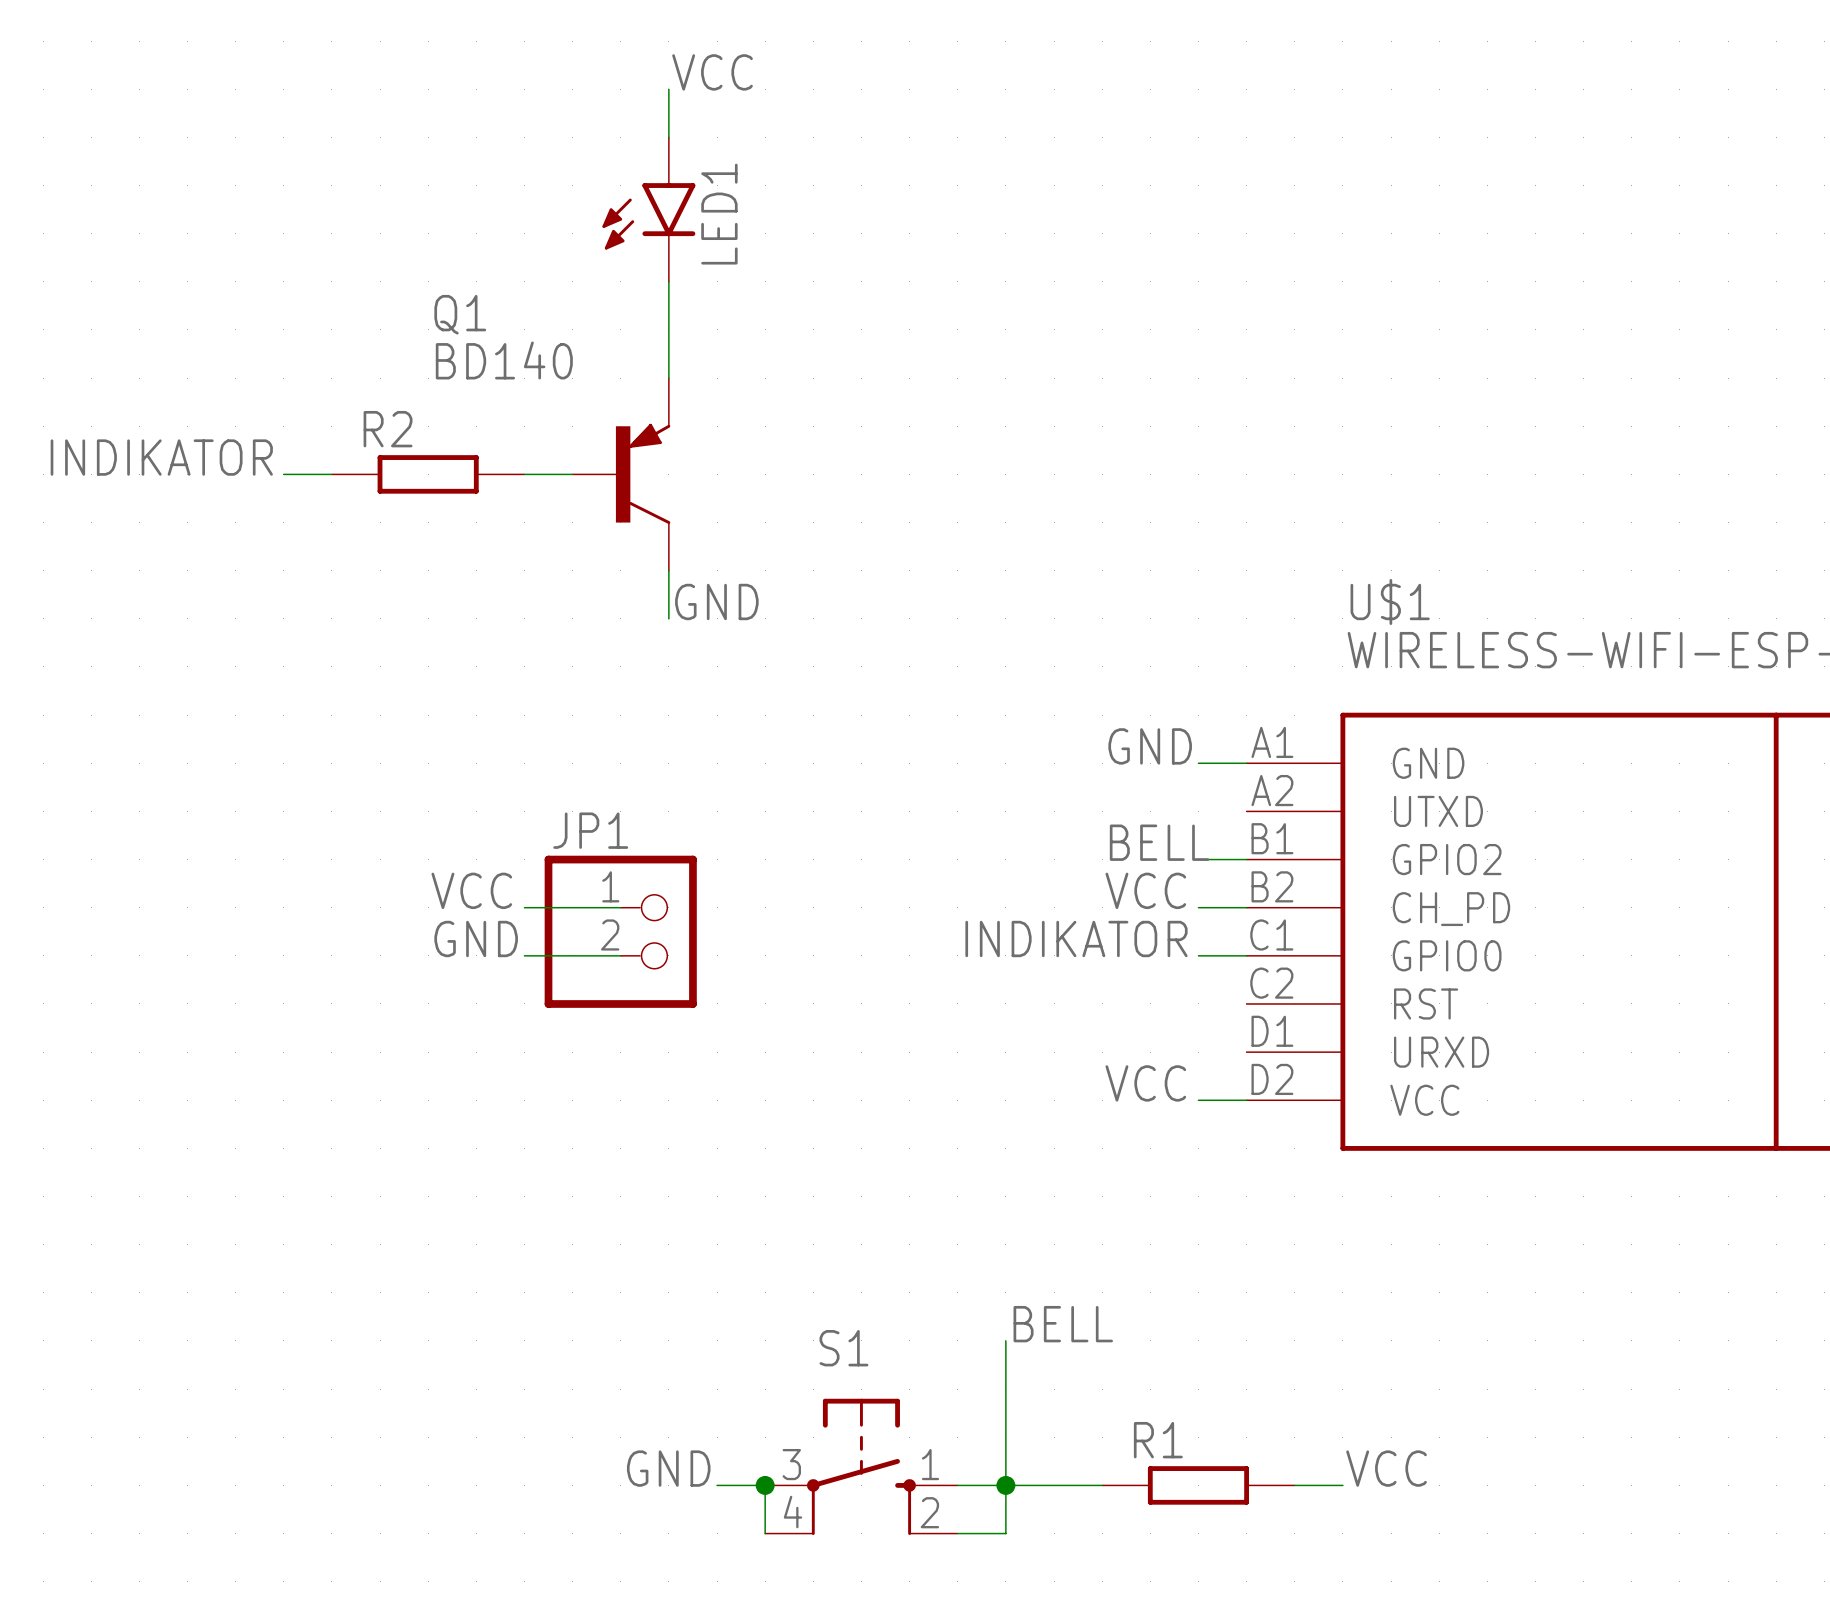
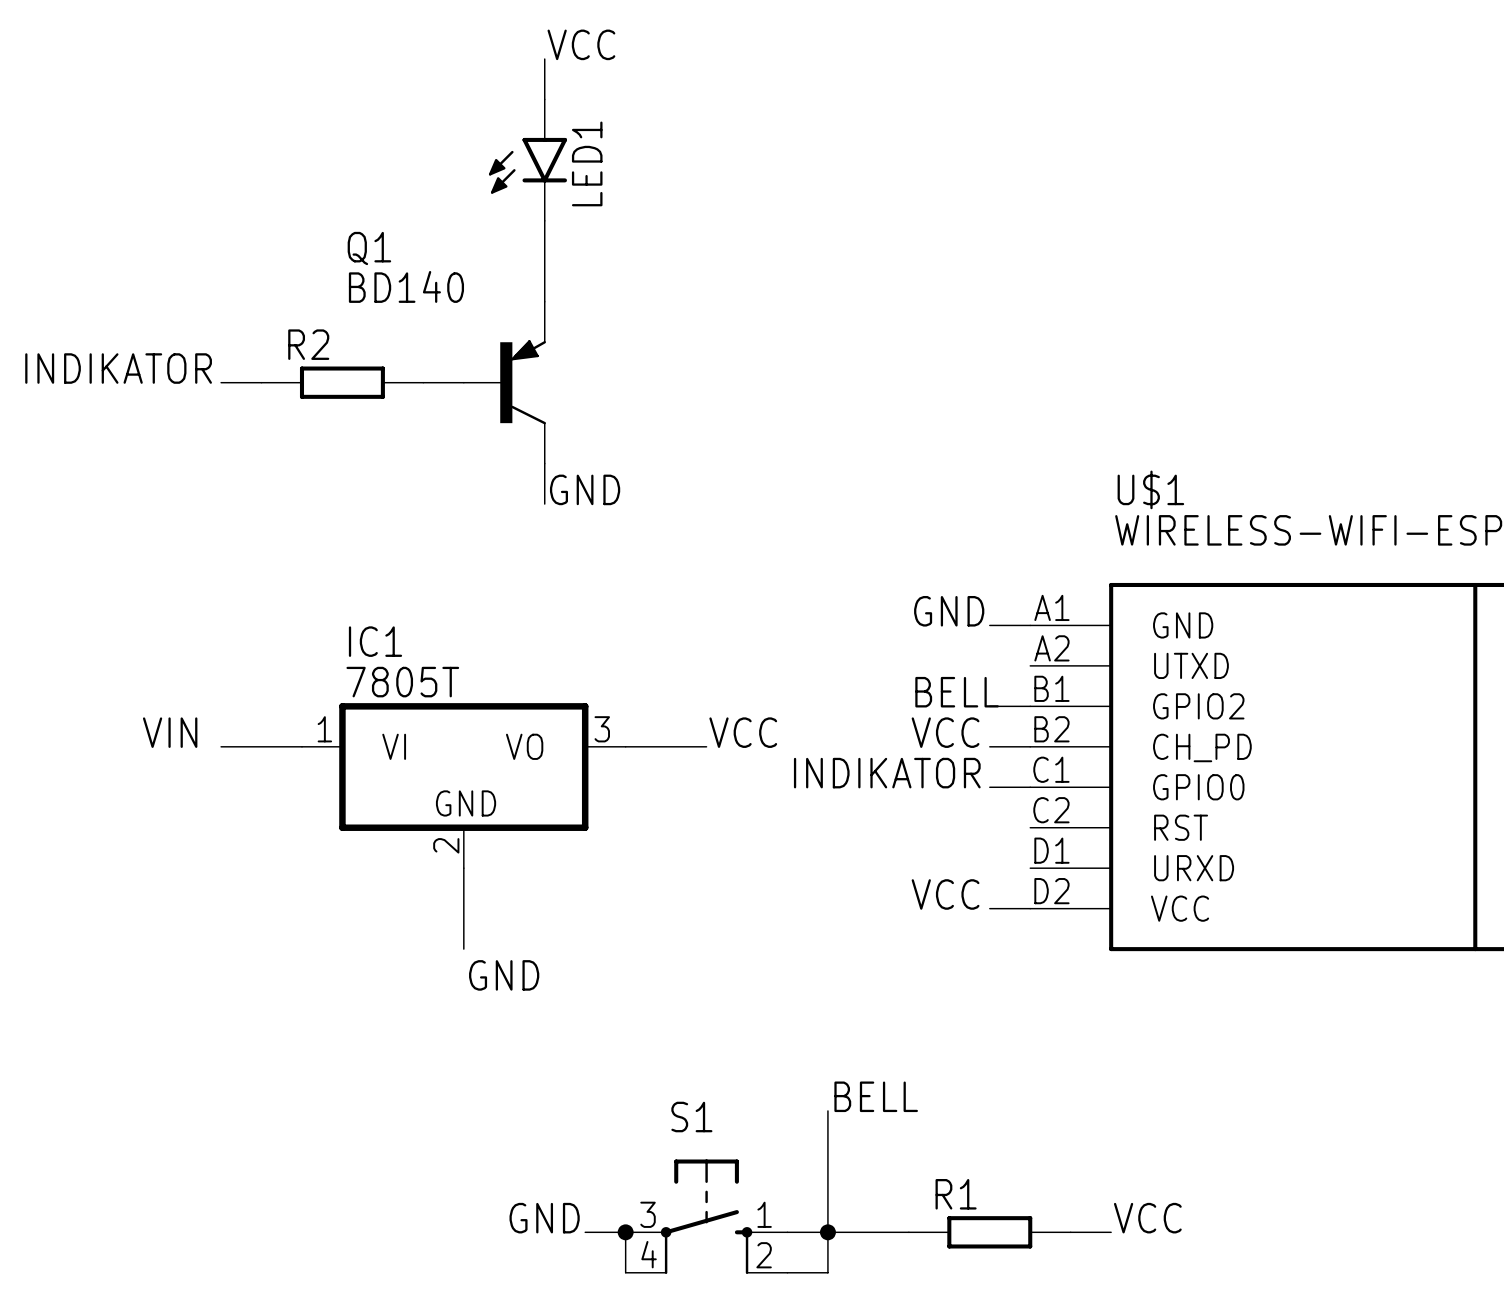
label: none -> VIN (170, 732)
label position: VCC (471, 890) -> VCC (743, 732)
wire: (524, 907) (620, 907) -> (221, 746) (301, 746)
JP1: (620, 931) -> none
label position: GND (476, 938) -> GND (504, 975)
IC1: none -> 7805T (463, 785)
wire: (524, 955) (620, 955) -> (625, 746) (706, 746)
wire: none -> (463, 868) (463, 949)

